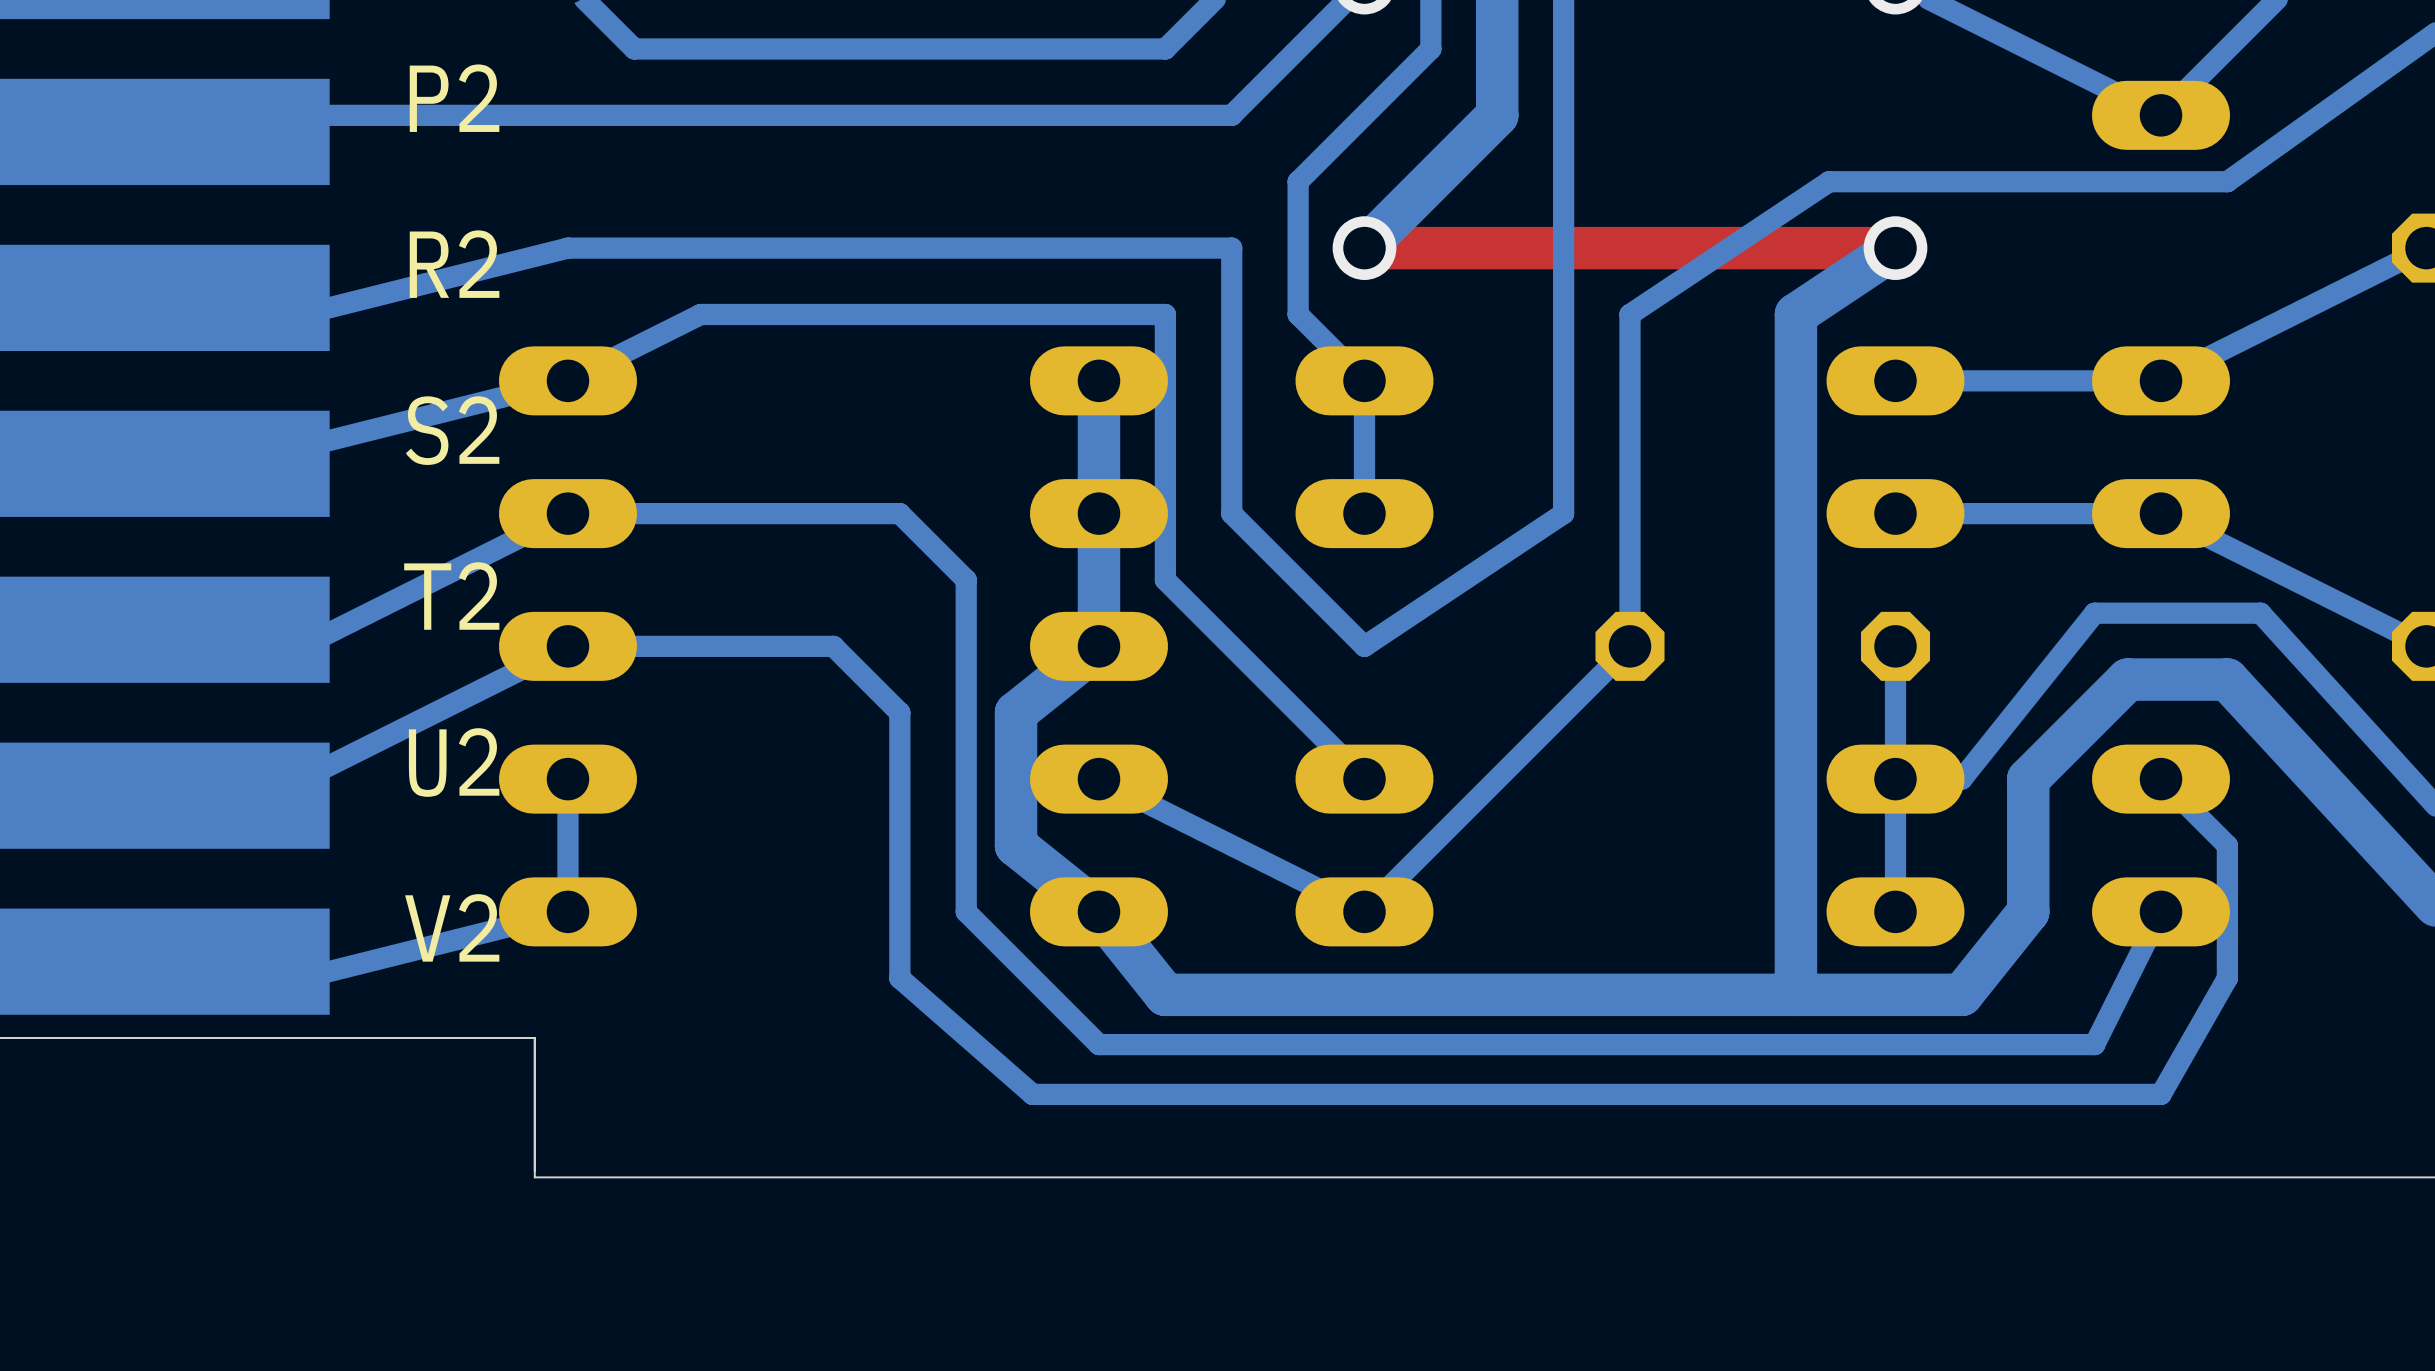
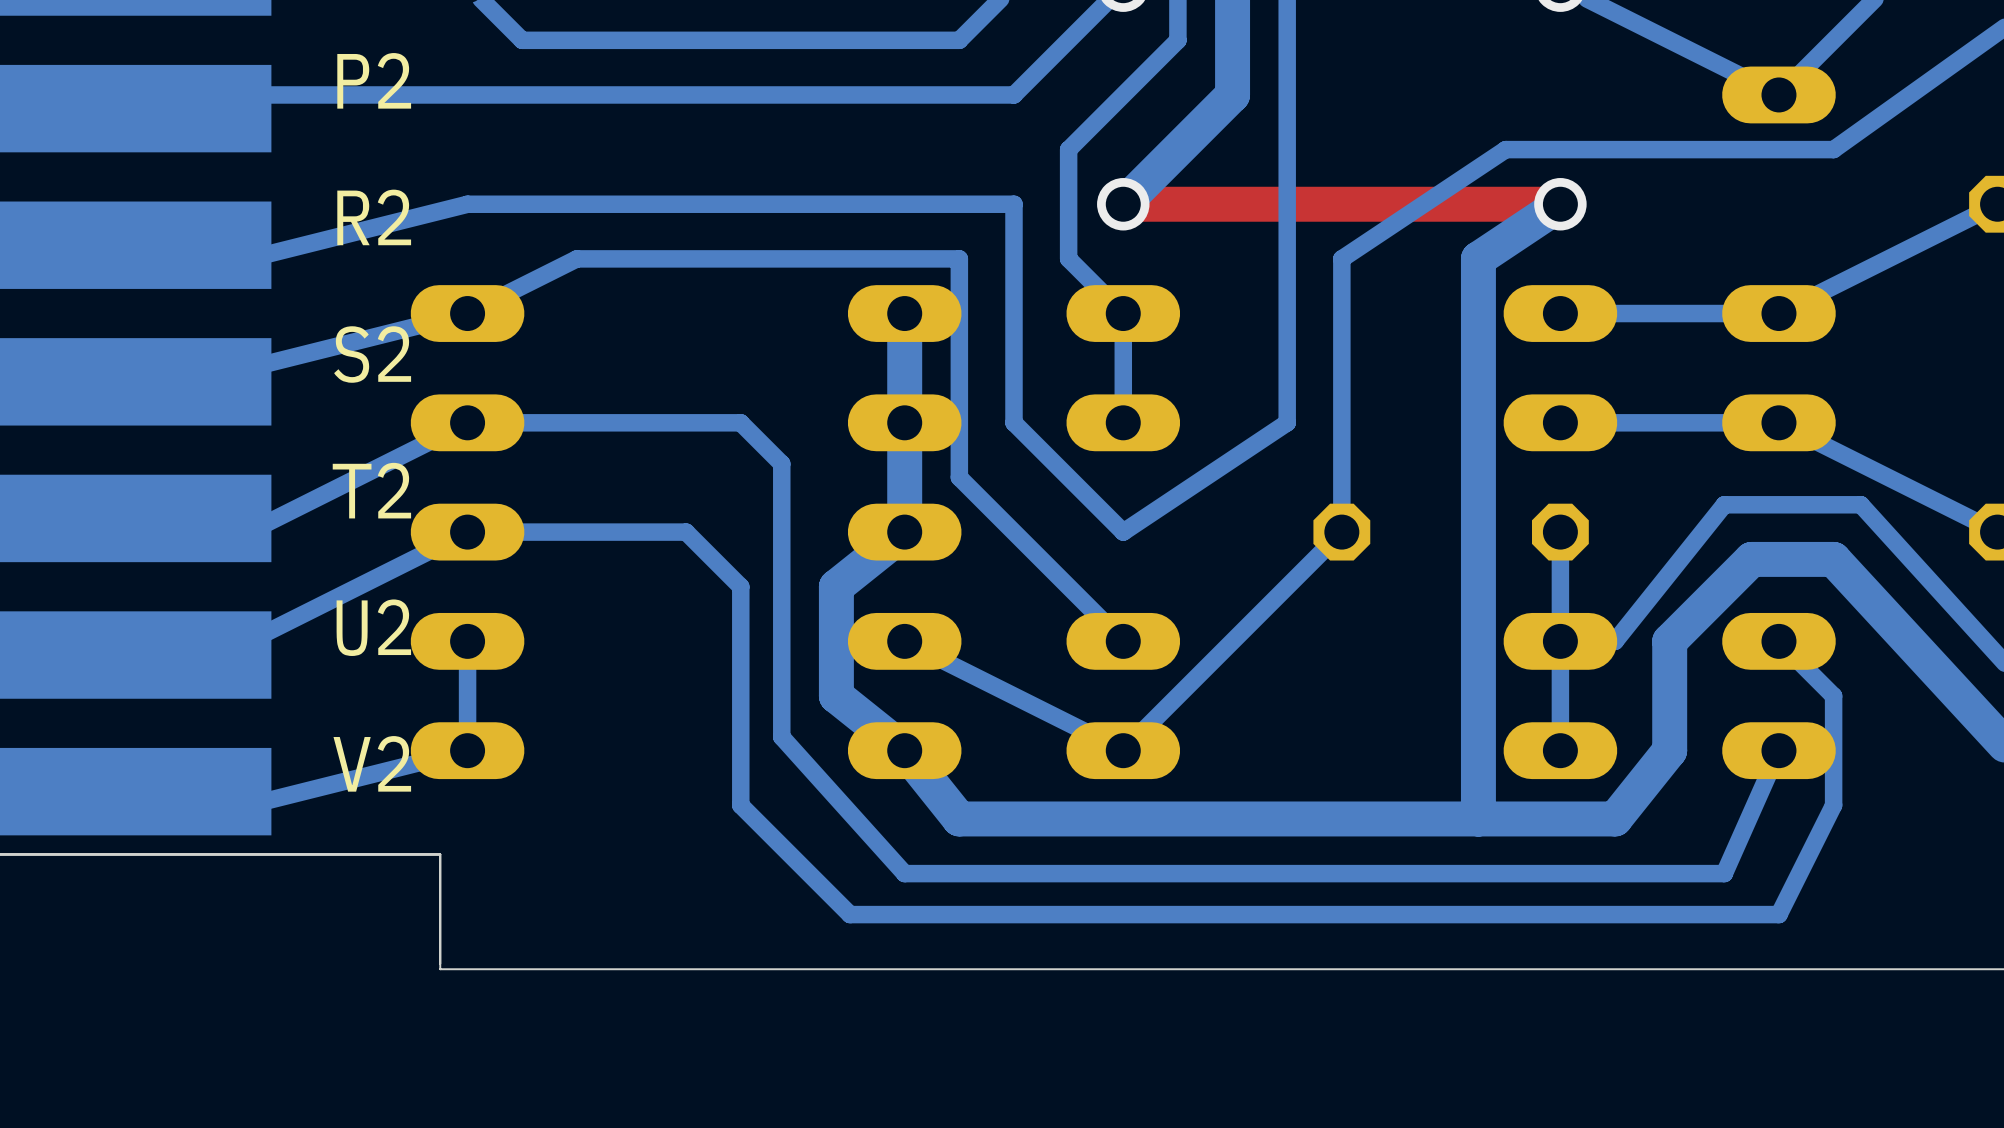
bottom track: (949, 563) (966, 579) (966, 911) (1098, 1044) (2094, 1044) (2161, 911) -> (781, 463) (781, 737) (904, 873) (1724, 873) (1778, 750)
bottom track: (2227, 978) (2161, 1094) (1032, 1094) (899, 978) -> (1833, 805) (1778, 914) (850, 914) (740, 805)

